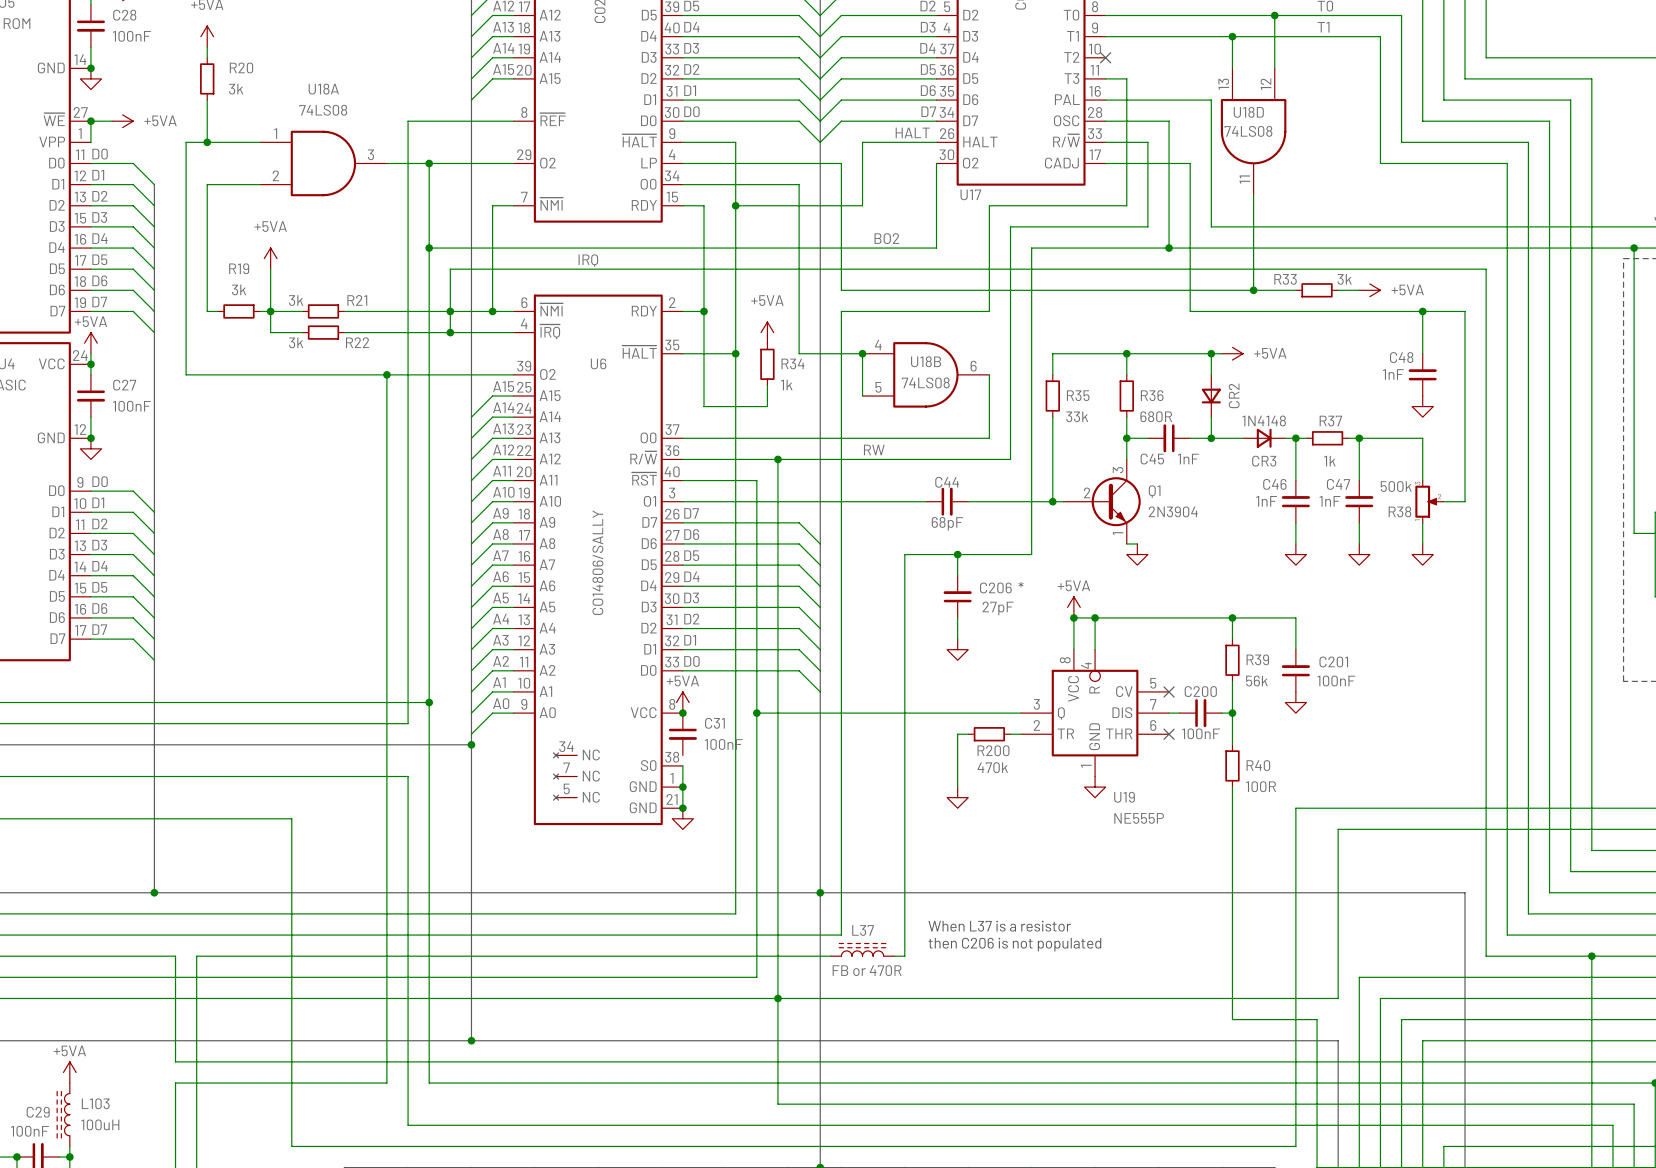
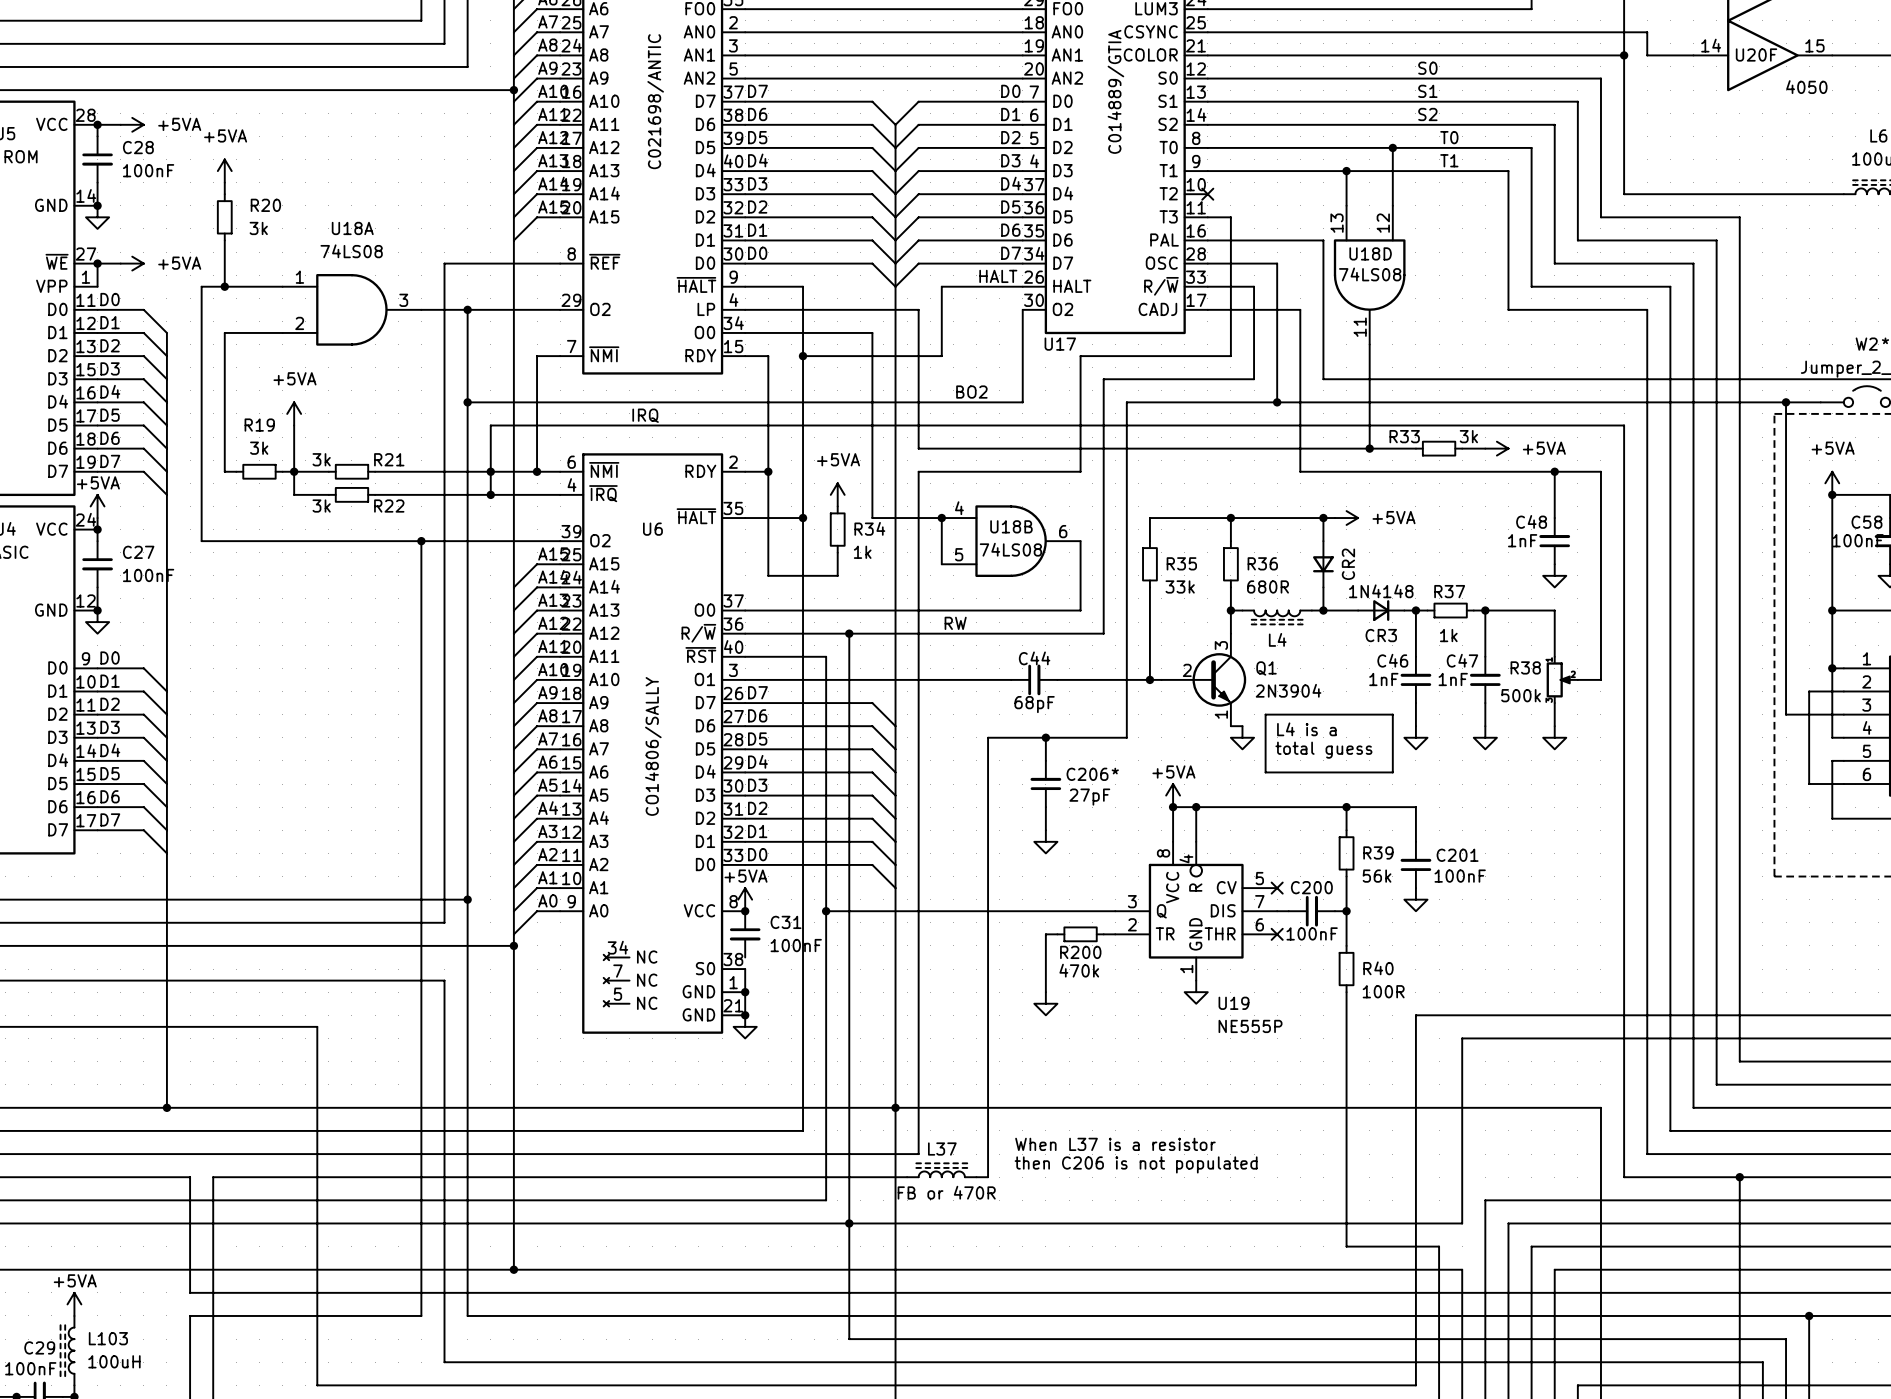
C45: 1nF (1169, 438) -> none
L4: none -> (1277, 617)
R38 flip: as is (1425, 501) -> up-down (1558, 679)
line: none -> (1265, 714) (1392, 714) (1392, 772) (1265, 772) (1265, 714)
text: none -> L4 is a (1306, 729)
text: none -> total guess (1323, 750)

